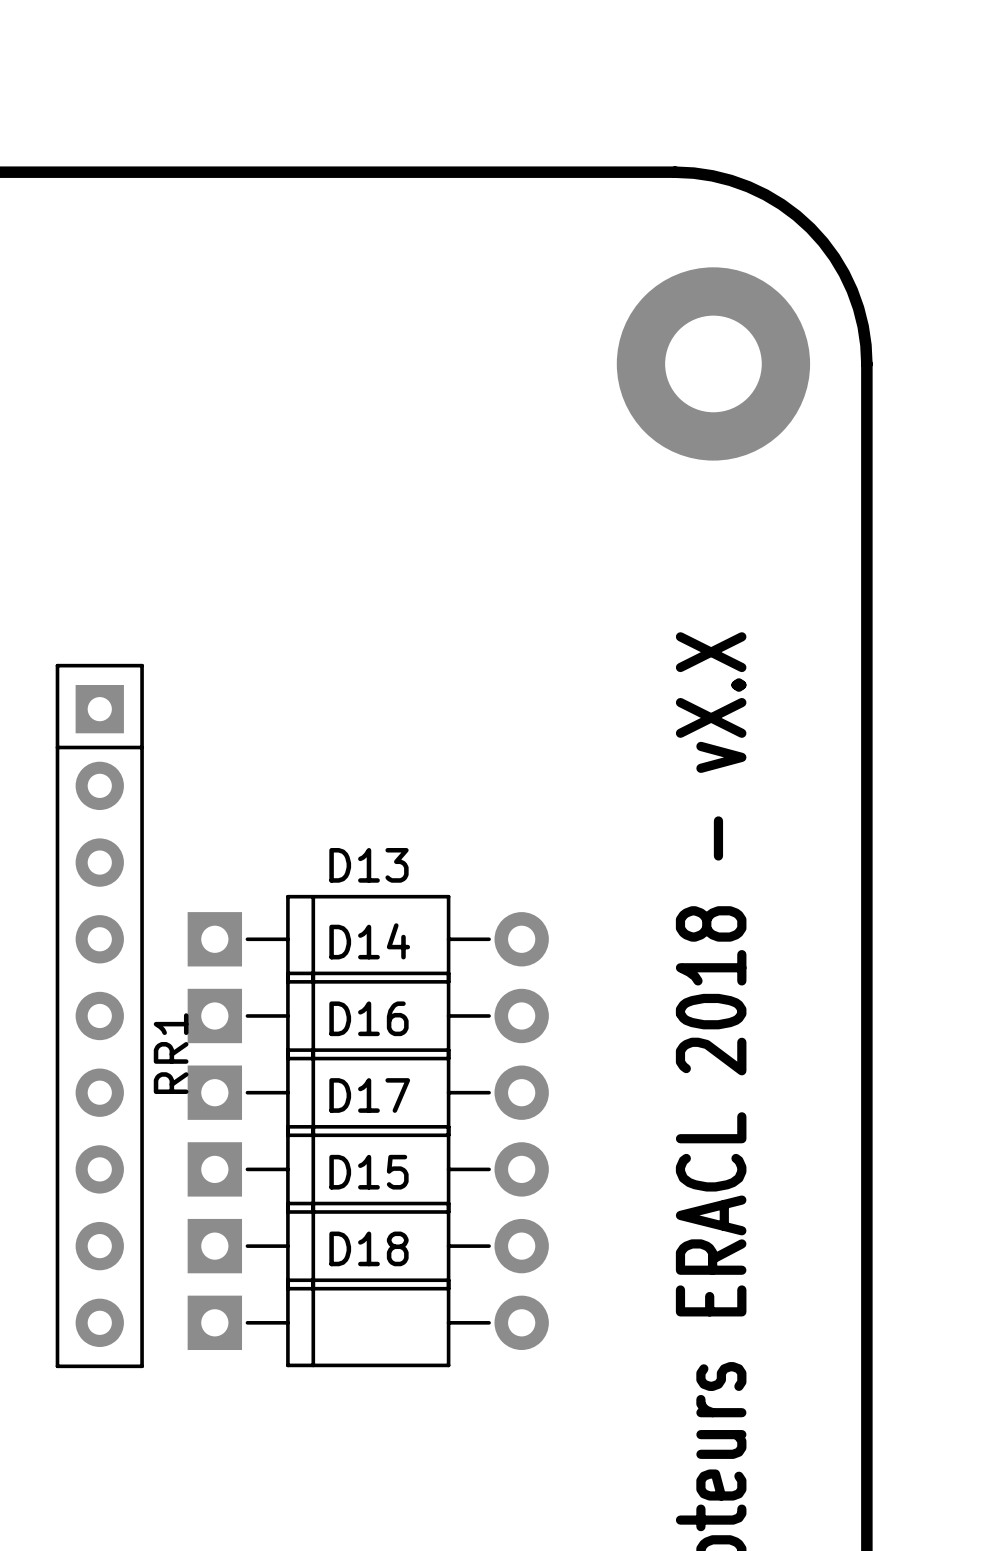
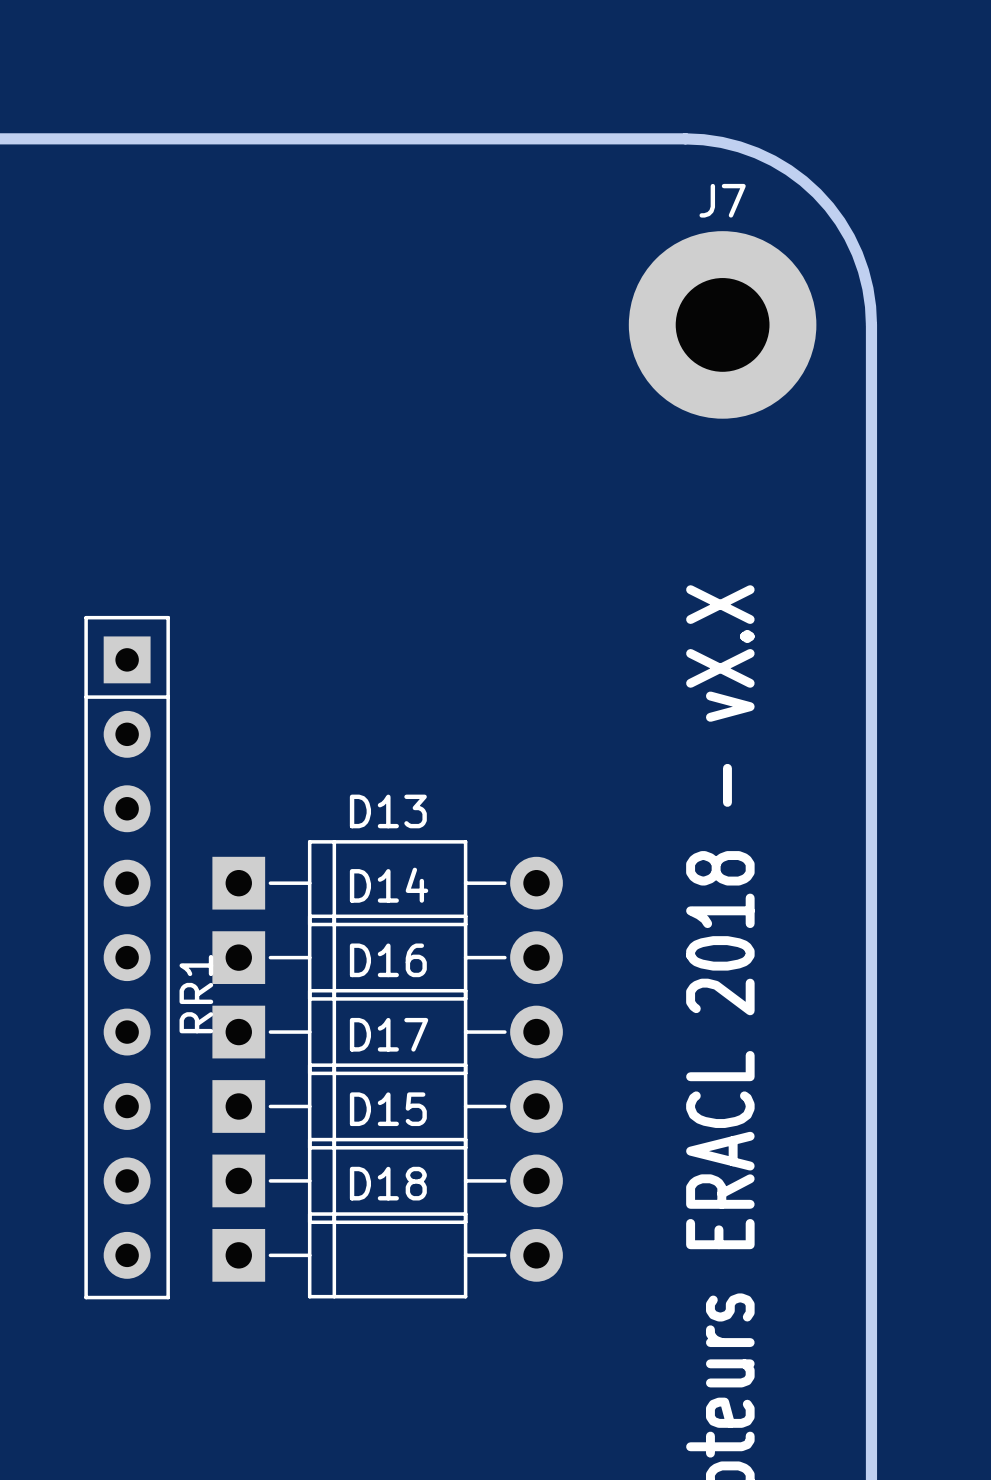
J7 name: none -> J7 (722, 200)

